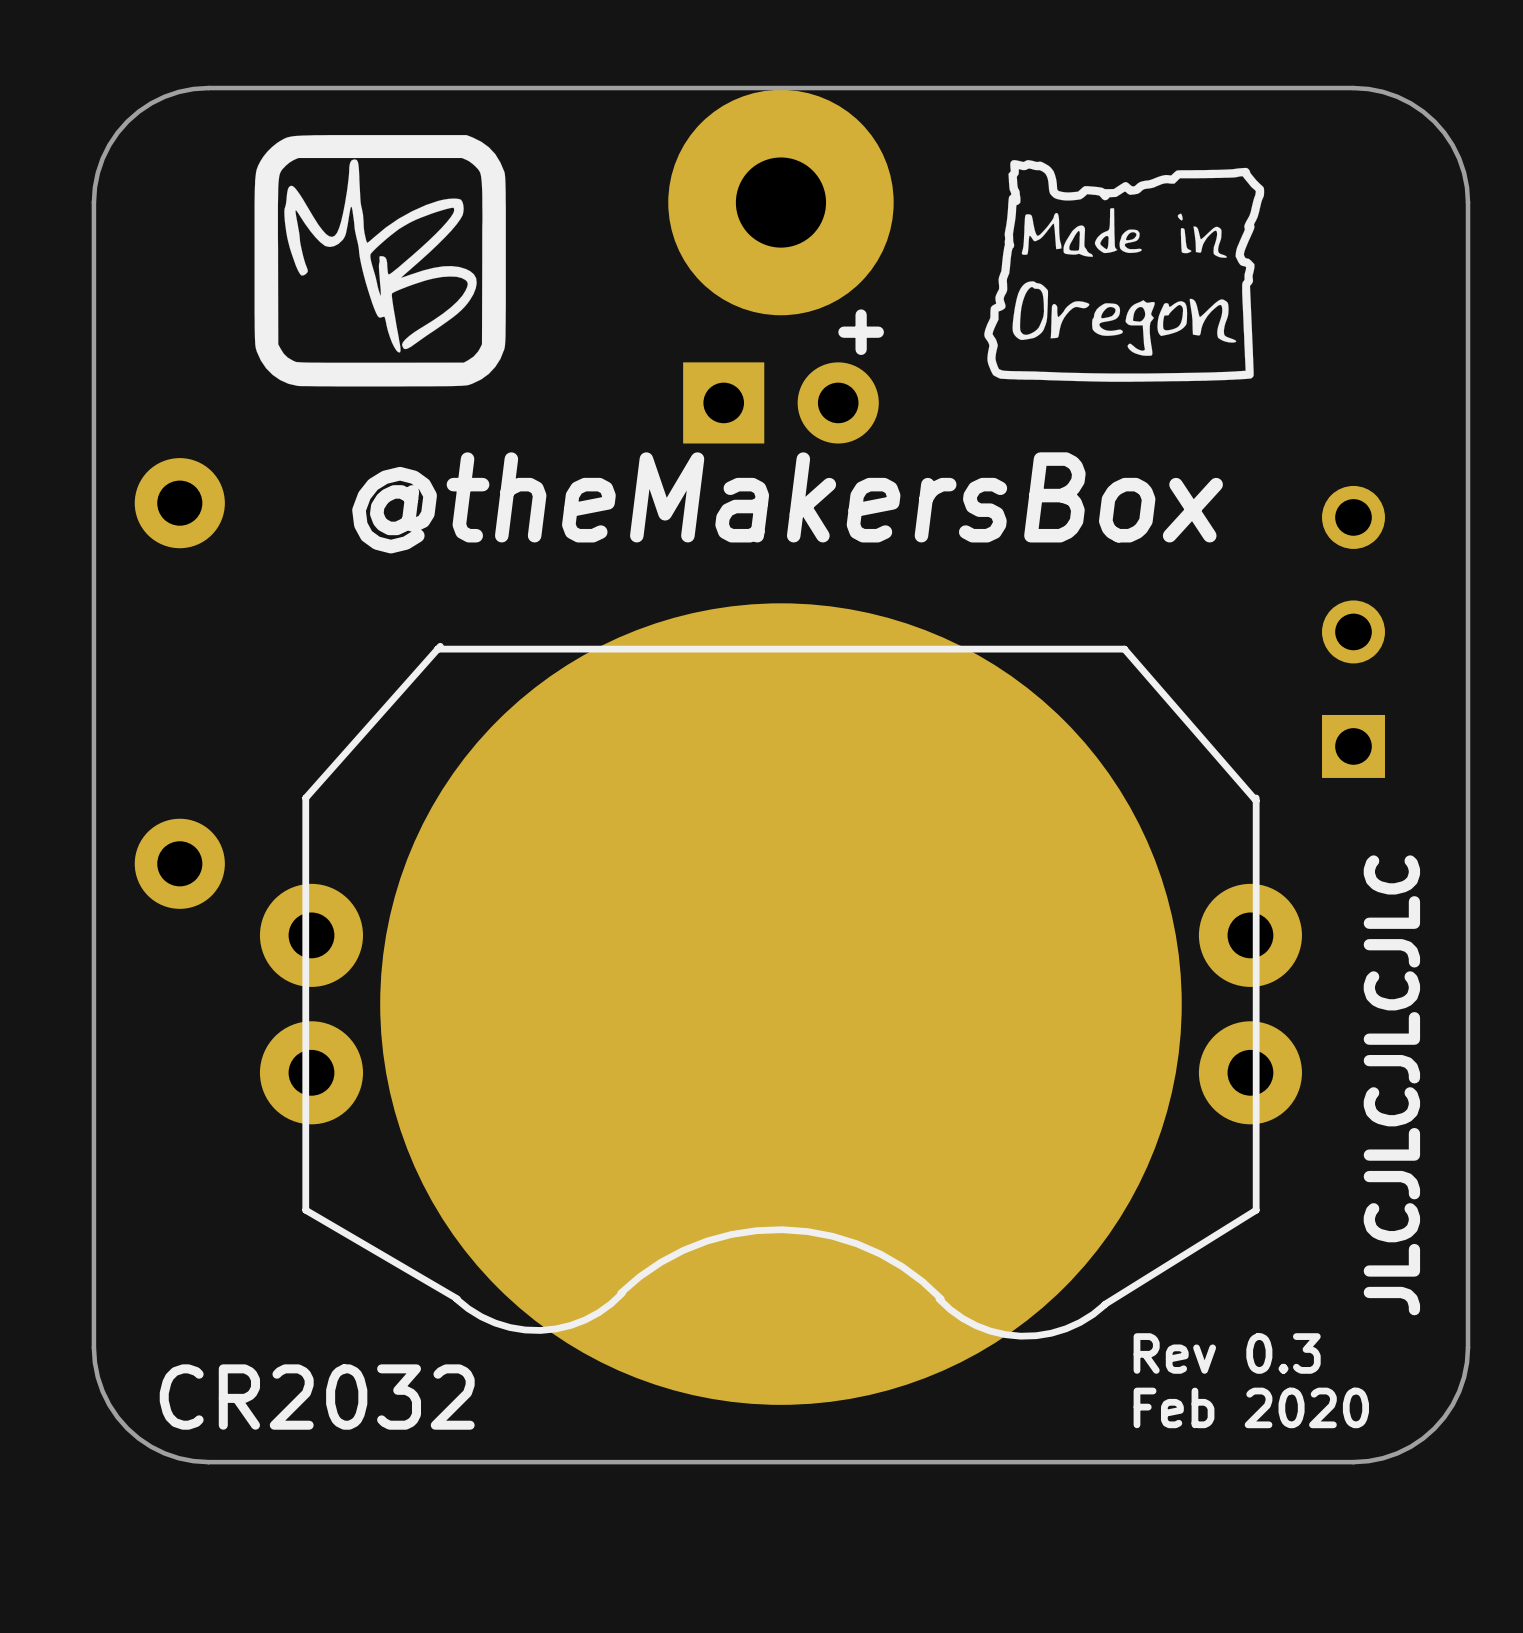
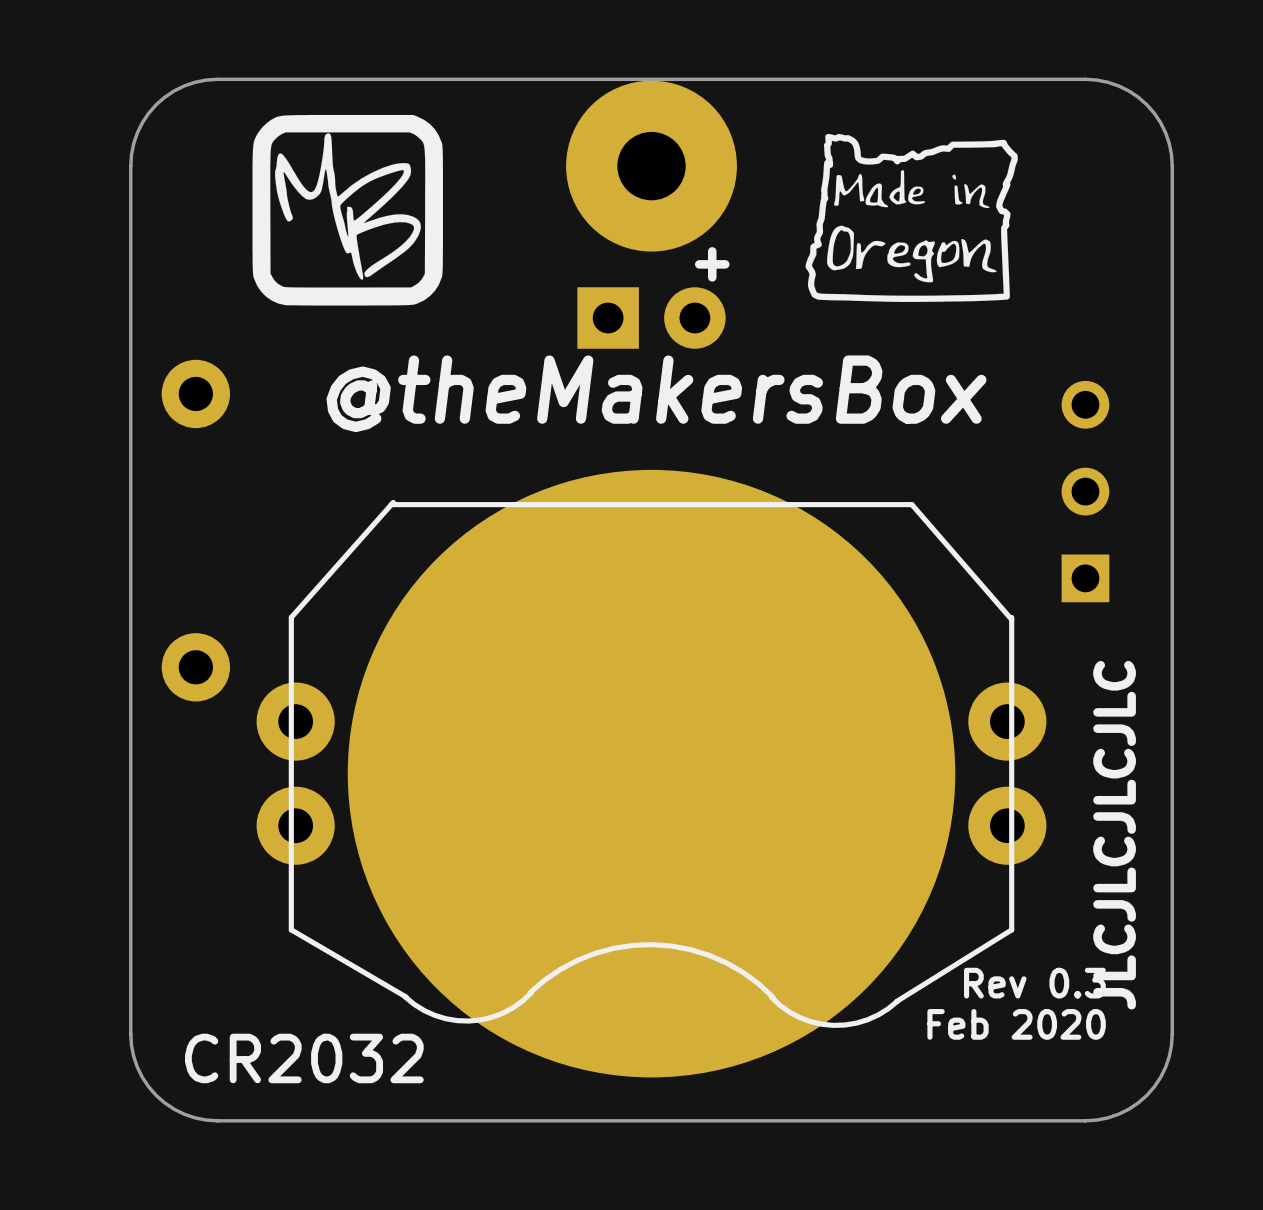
text position: Rev 0.3 (1227, 1353) -> Rev 0.3 (1034, 983)
text position: CR2032 (317, 1397) -> CR2032 (304, 1058)
text position: Feb 2020 (1251, 1407) -> Feb 2020 (1016, 1024)

